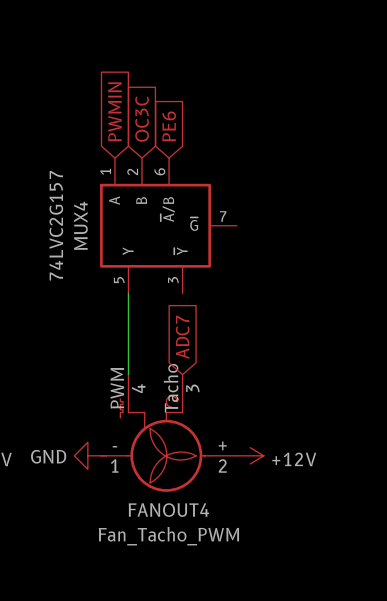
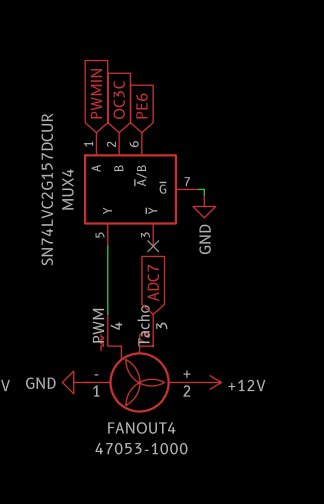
MUX4 value: 74LVC2G157 (56, 225) -> SN74LVC2G157DCUR (47, 189)
wire: none -> (198, 189) (204, 189) (204, 195)
power symbol: none -> GND (204, 206)
no-connect mark: none -> (153, 246)
FANOUT4 value: Fan_Tacho_PWM (168, 536) -> 47053-1000 (141, 448)

